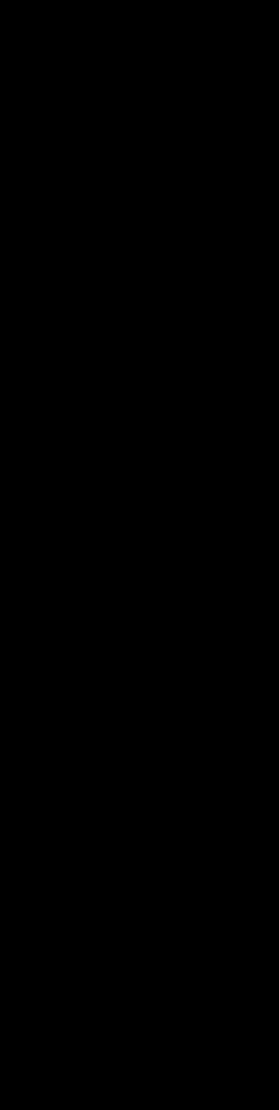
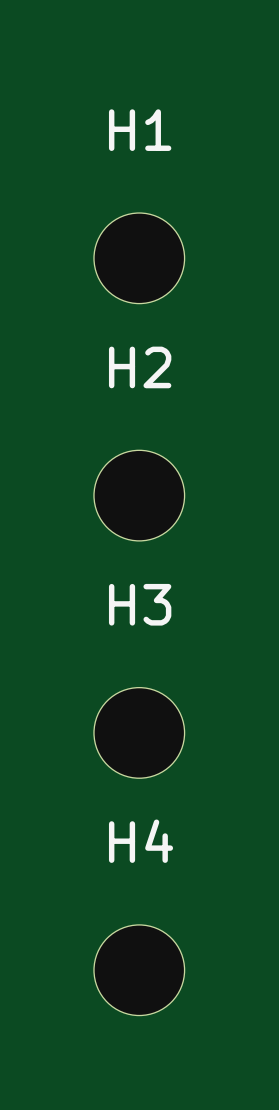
H1: none -> (139, 258)
H2: none -> (139, 495)
H3: none -> (139, 732)
H4: none -> (139, 970)

